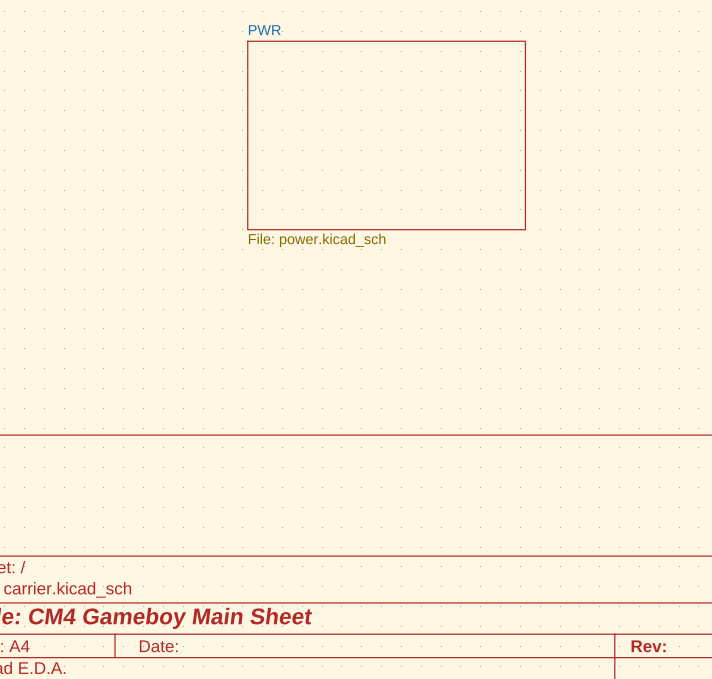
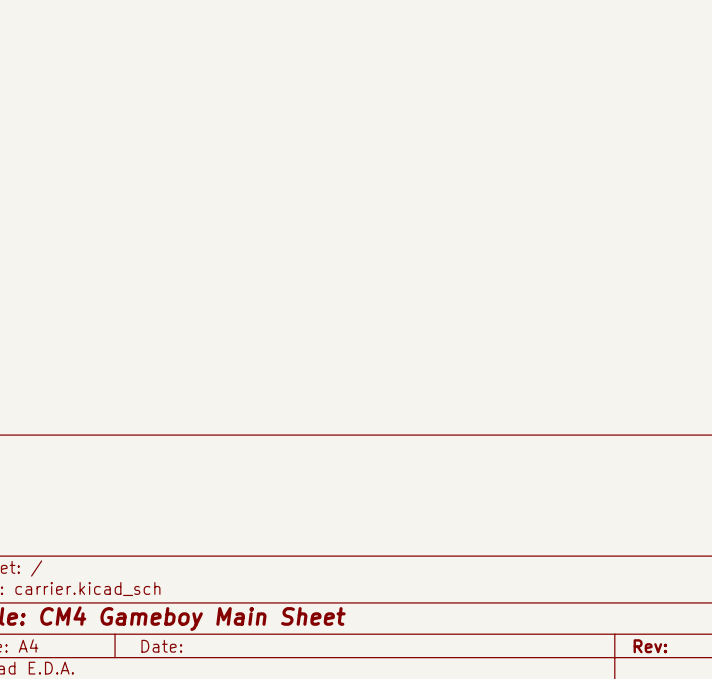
sheet PWR: File: power.kicad_sch (386, 135) -> none

